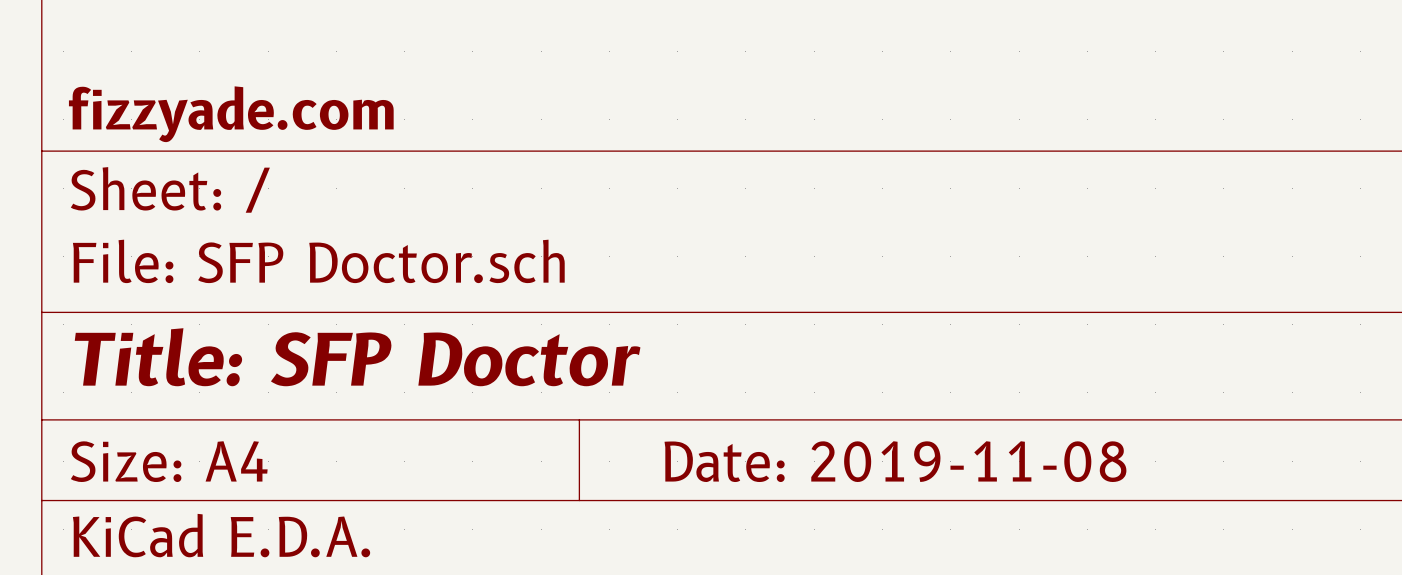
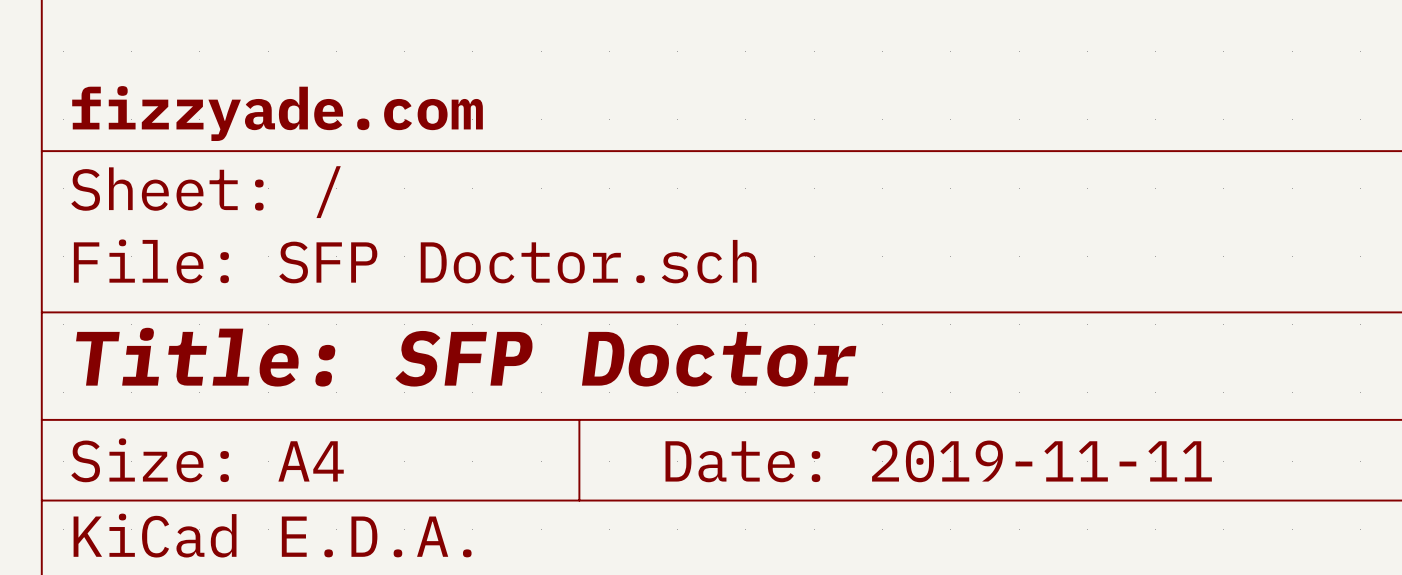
title block: Date: 2019-11-08 (895, 461) -> Date: 2019-11-11 (938, 461)

